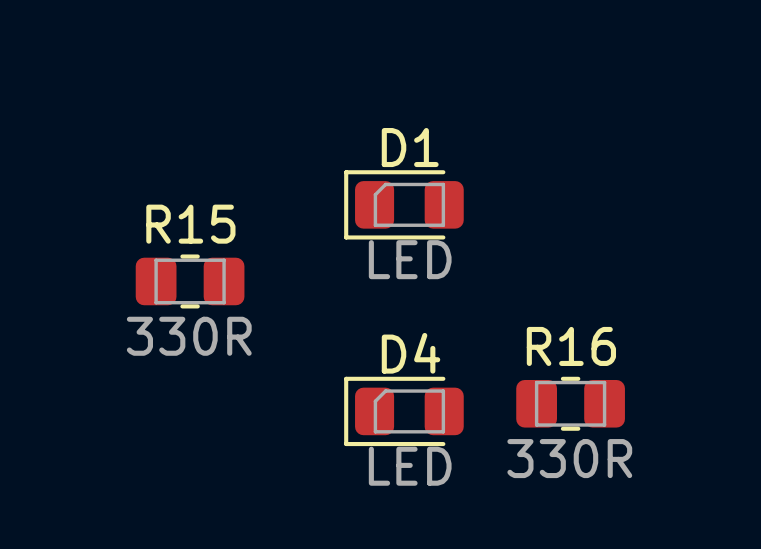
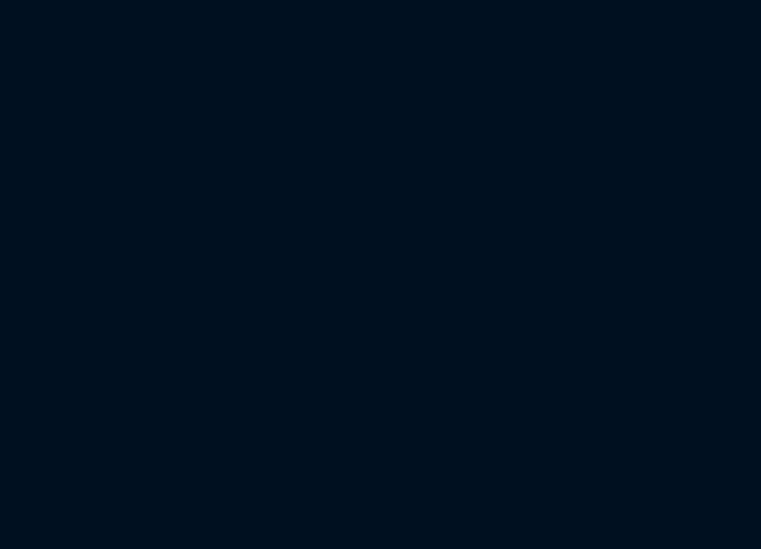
D1: LED (403, 204) -> none
R15: 330R (190, 281) -> none
R16: 330R (570, 403) -> none
D4: LED (403, 411) -> none

